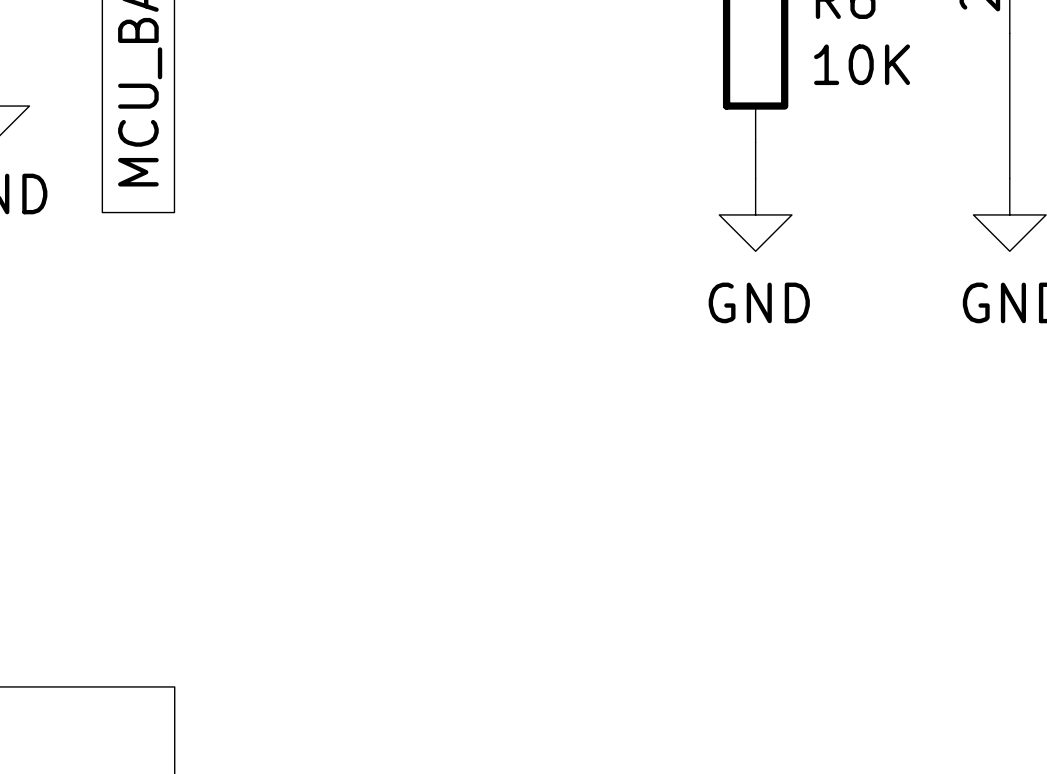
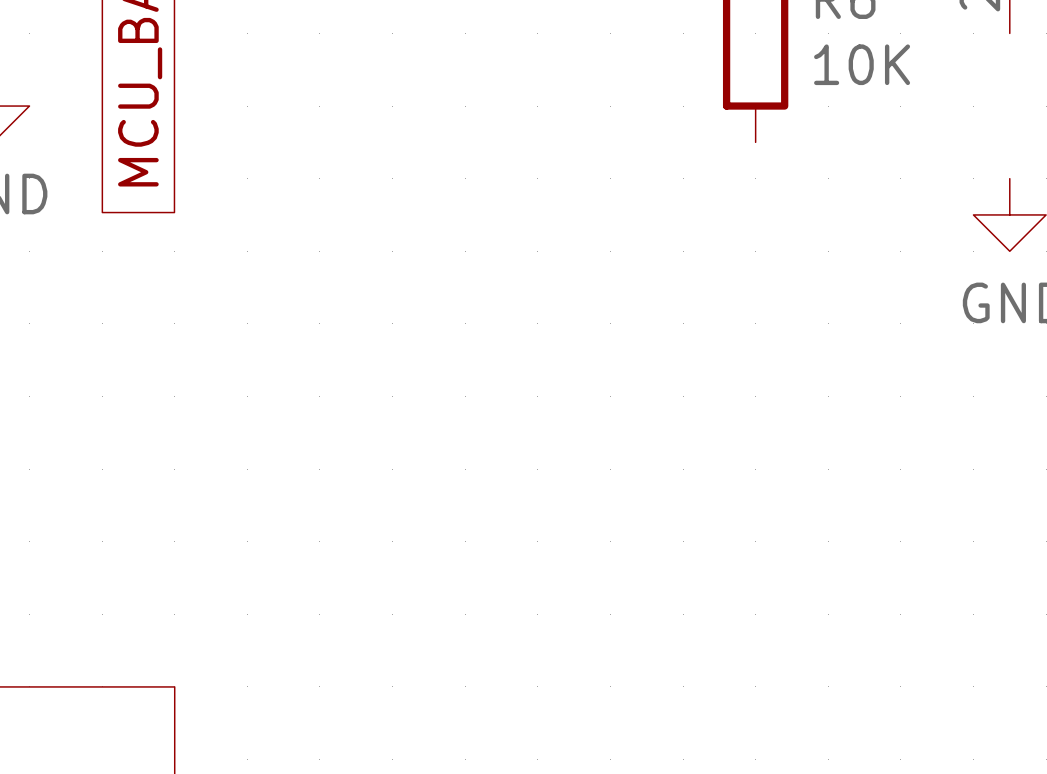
wire: (1009, 33) (1009, 178) -> none
wire: (755, 142) (755, 178) -> none
power symbol: GND (755, 214) -> none

